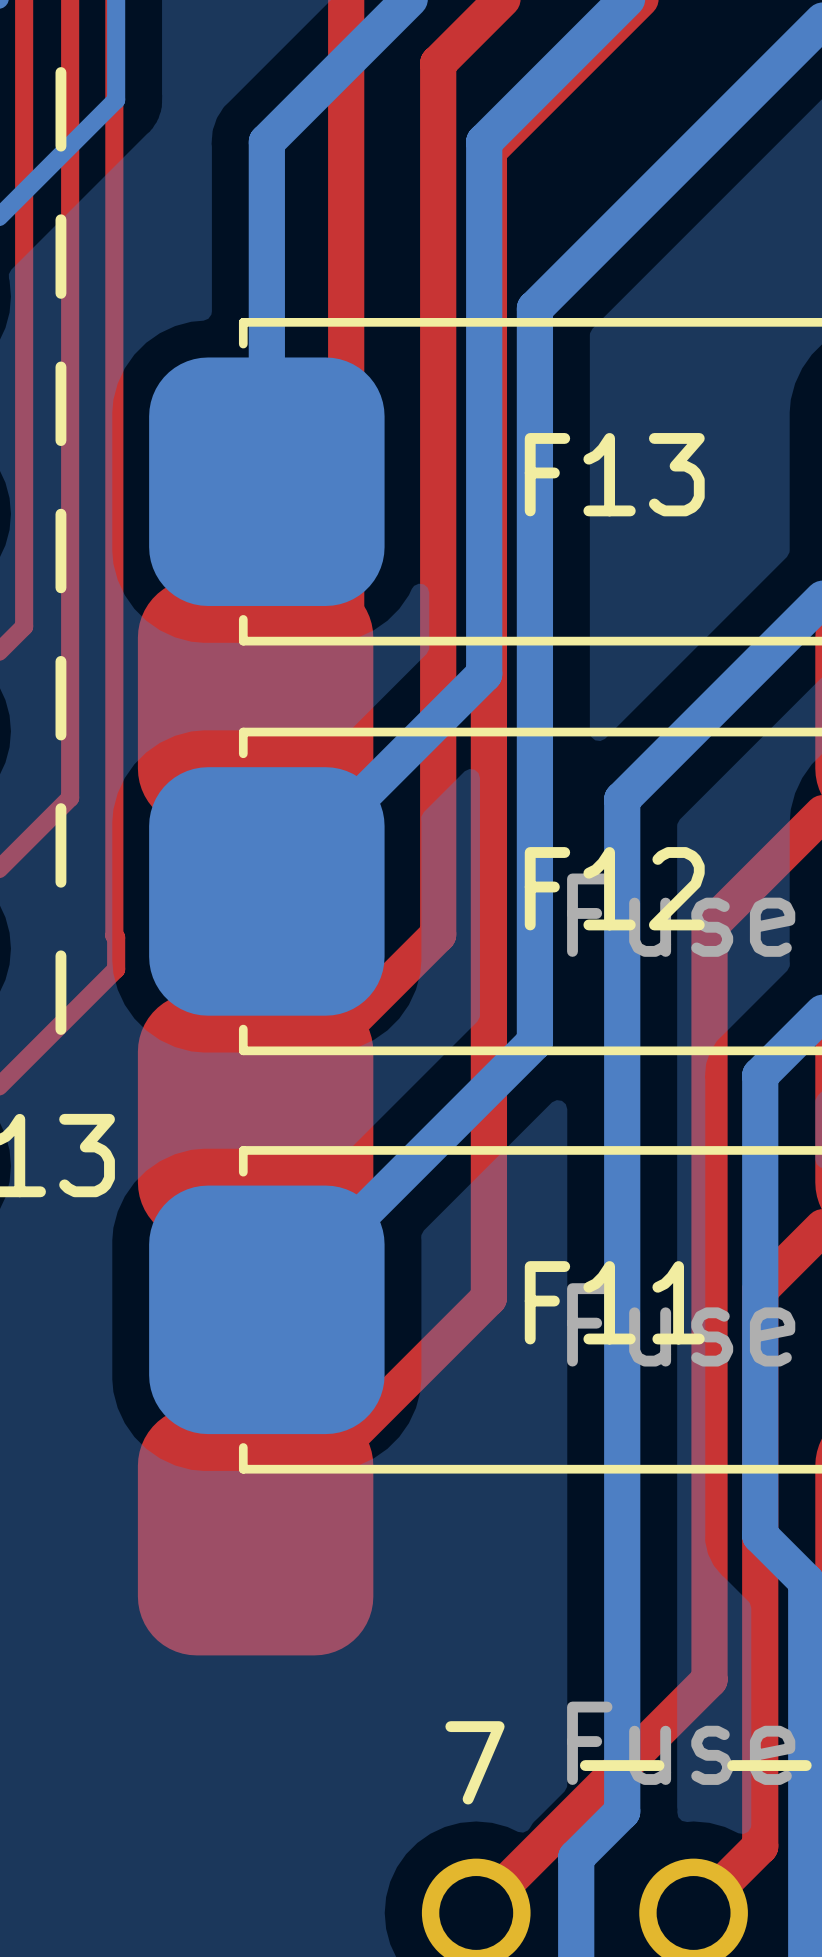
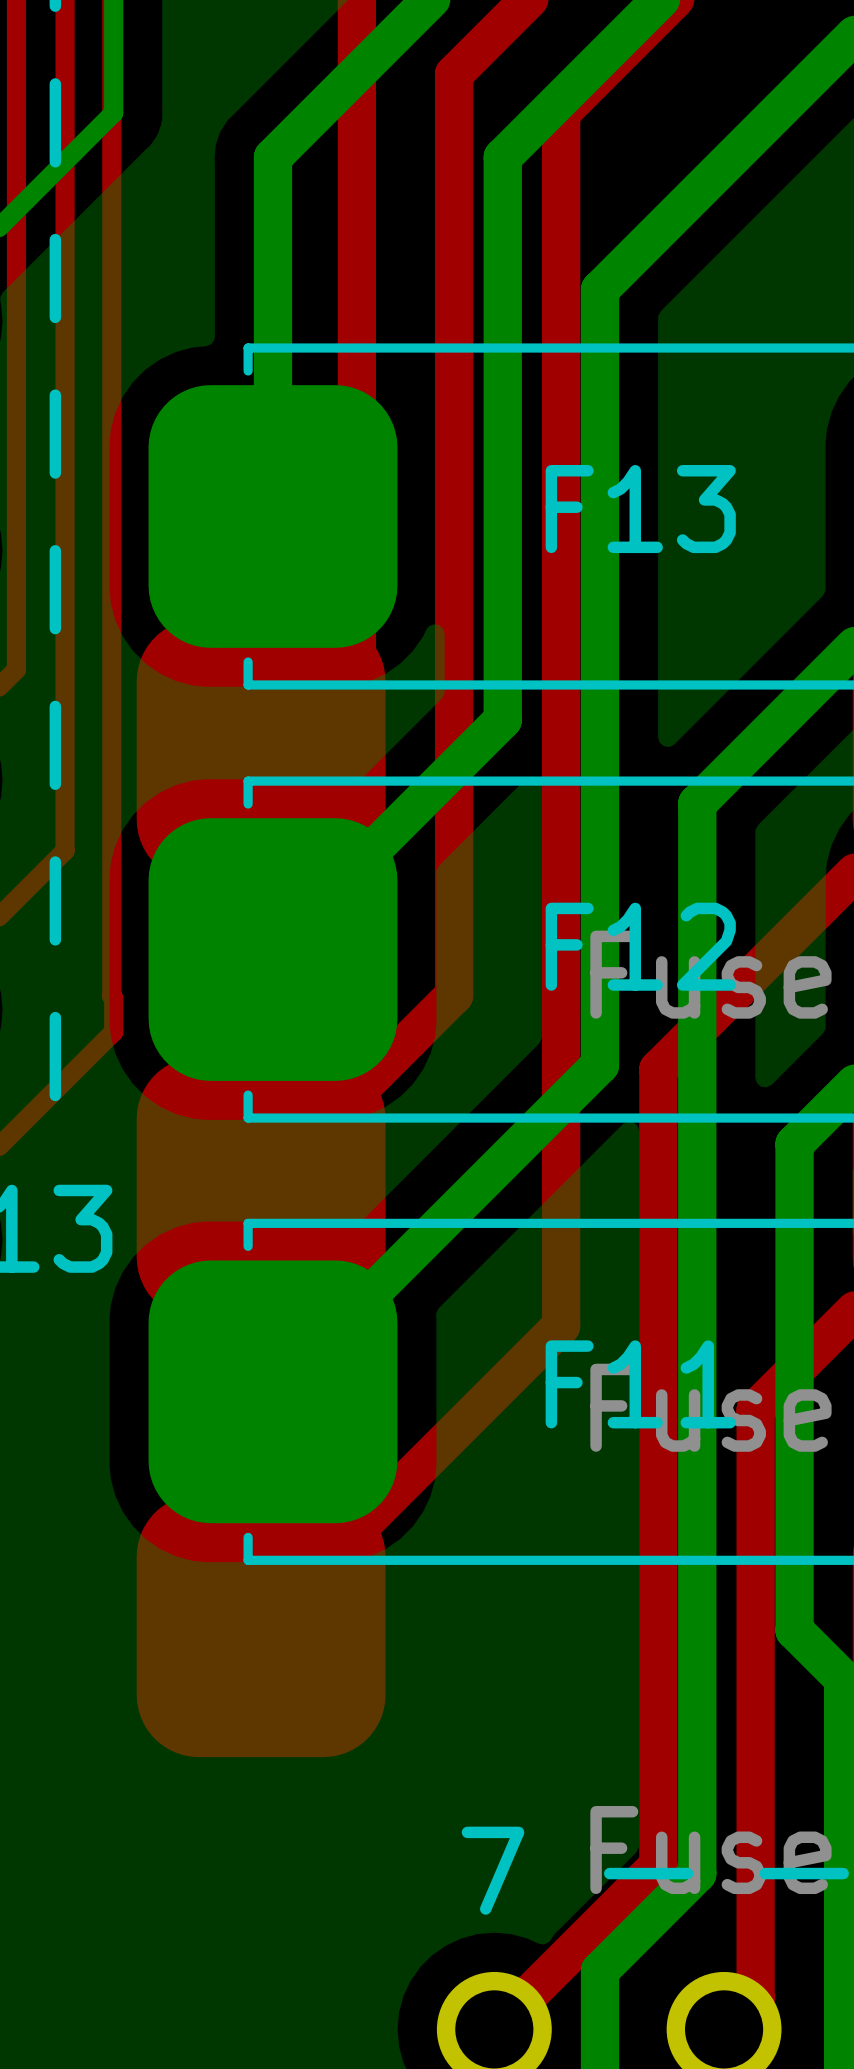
top track: (539, 100) (488, 150) (488, 1297) -> (561, 113) (561, 1325) (507, 1379)
bottom track: (576, 267) (534, 308) (534, 1041) -> (600, 289) (600, 1064) (556, 1108)
bottom track: (668, 753) (622, 799) (622, 1811) -> (697, 803) (697, 1873) (648, 1922)
top track: (709, 926) (709, 1679) (631, 1757) -> (740, 986) (658, 1069) (658, 1865)
top track: (760, 1289) (760, 1846) (723, 1883) -> (794, 1370) (755, 1409) (755, 1997)

